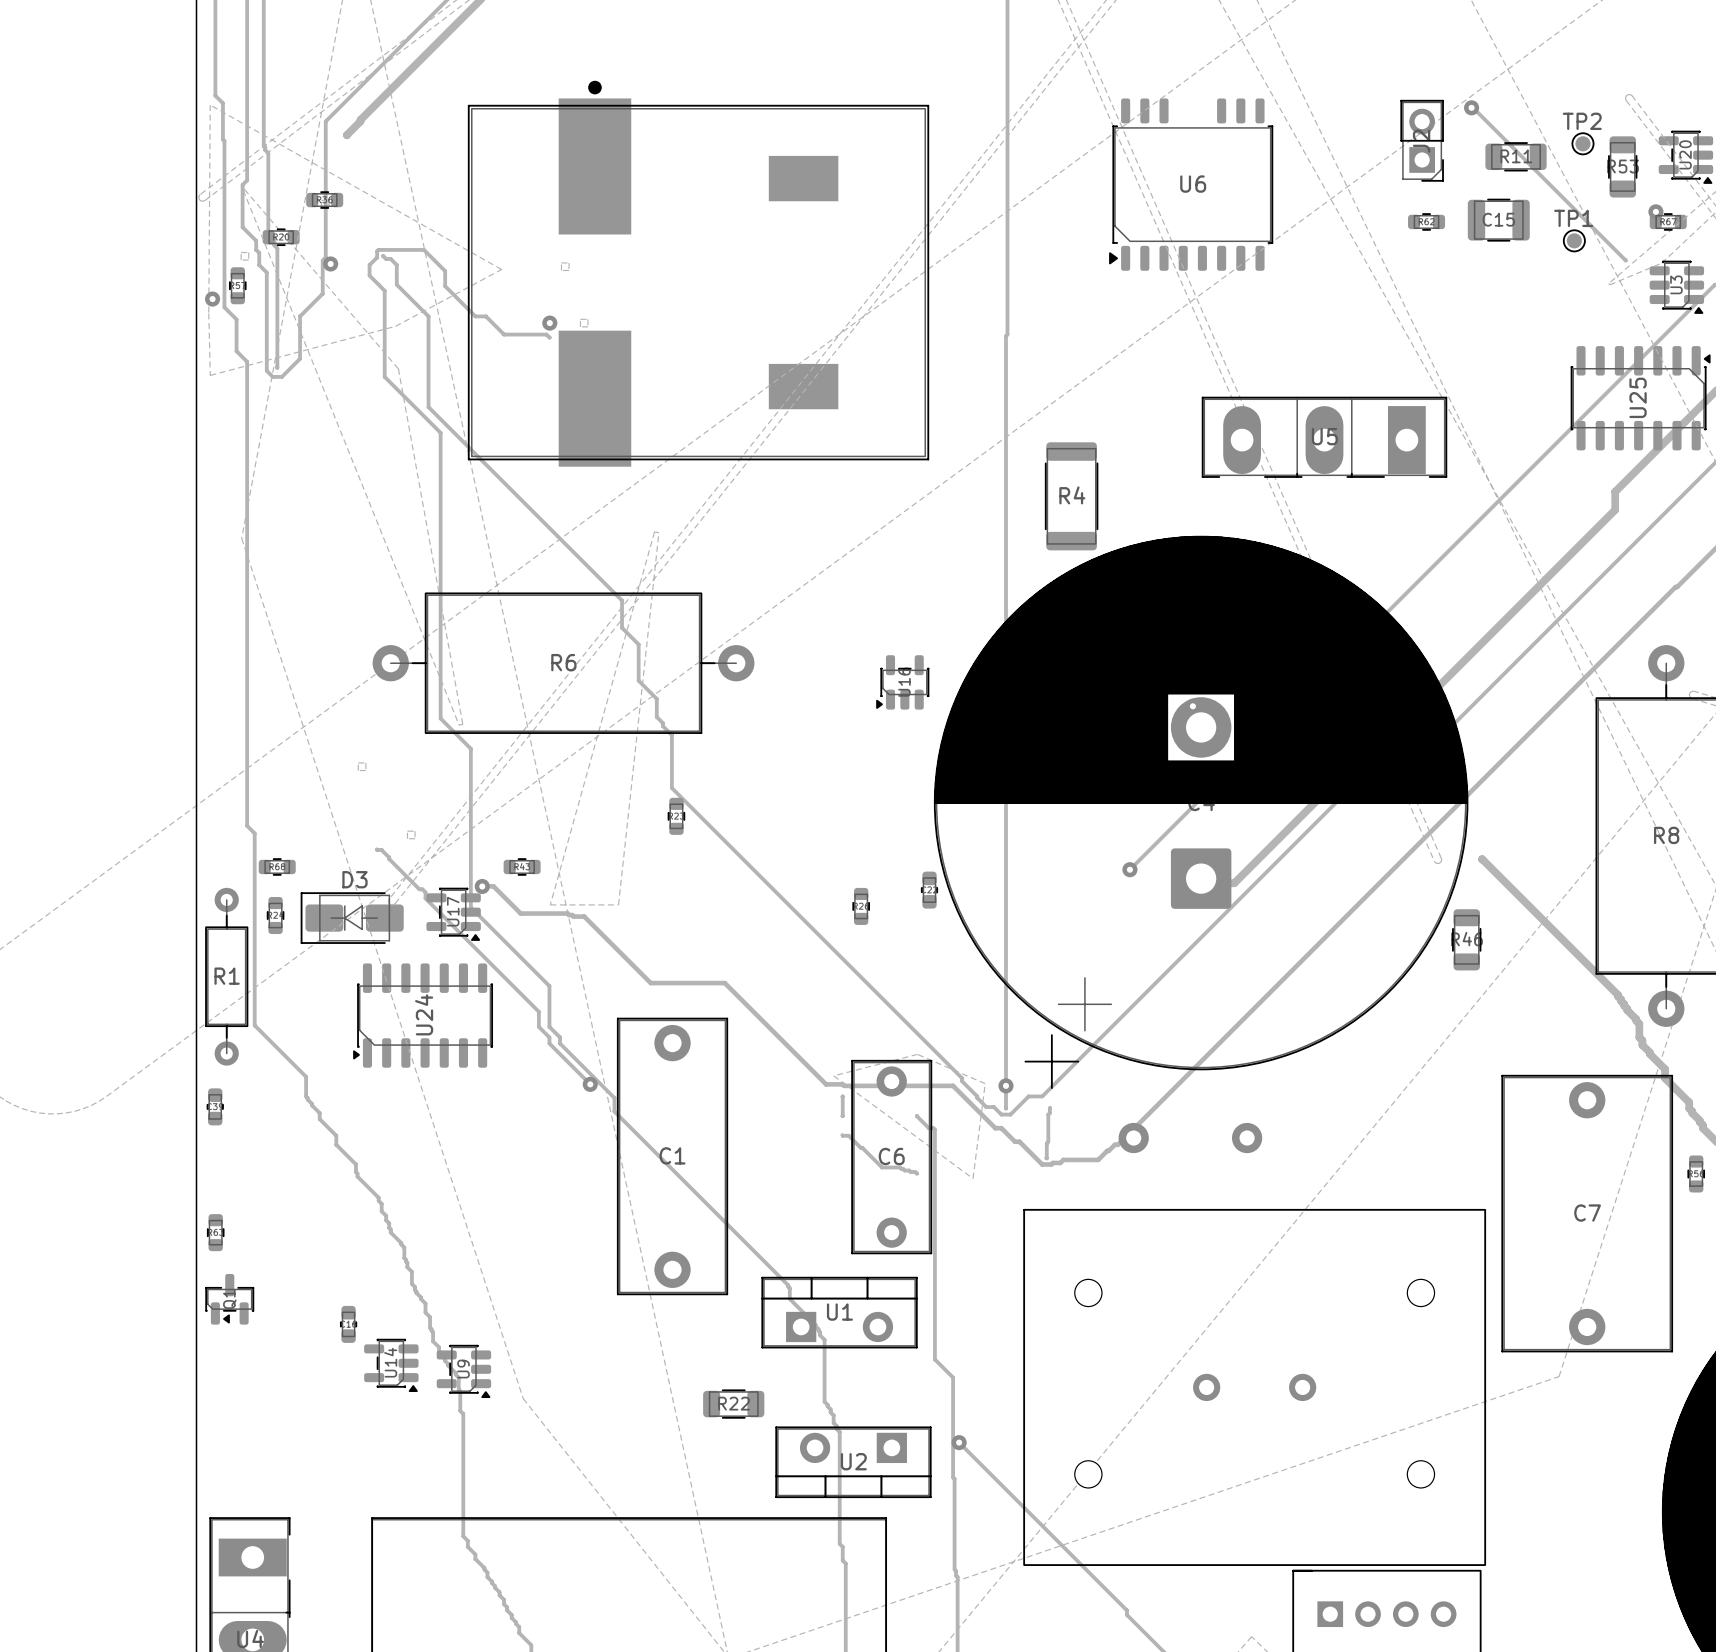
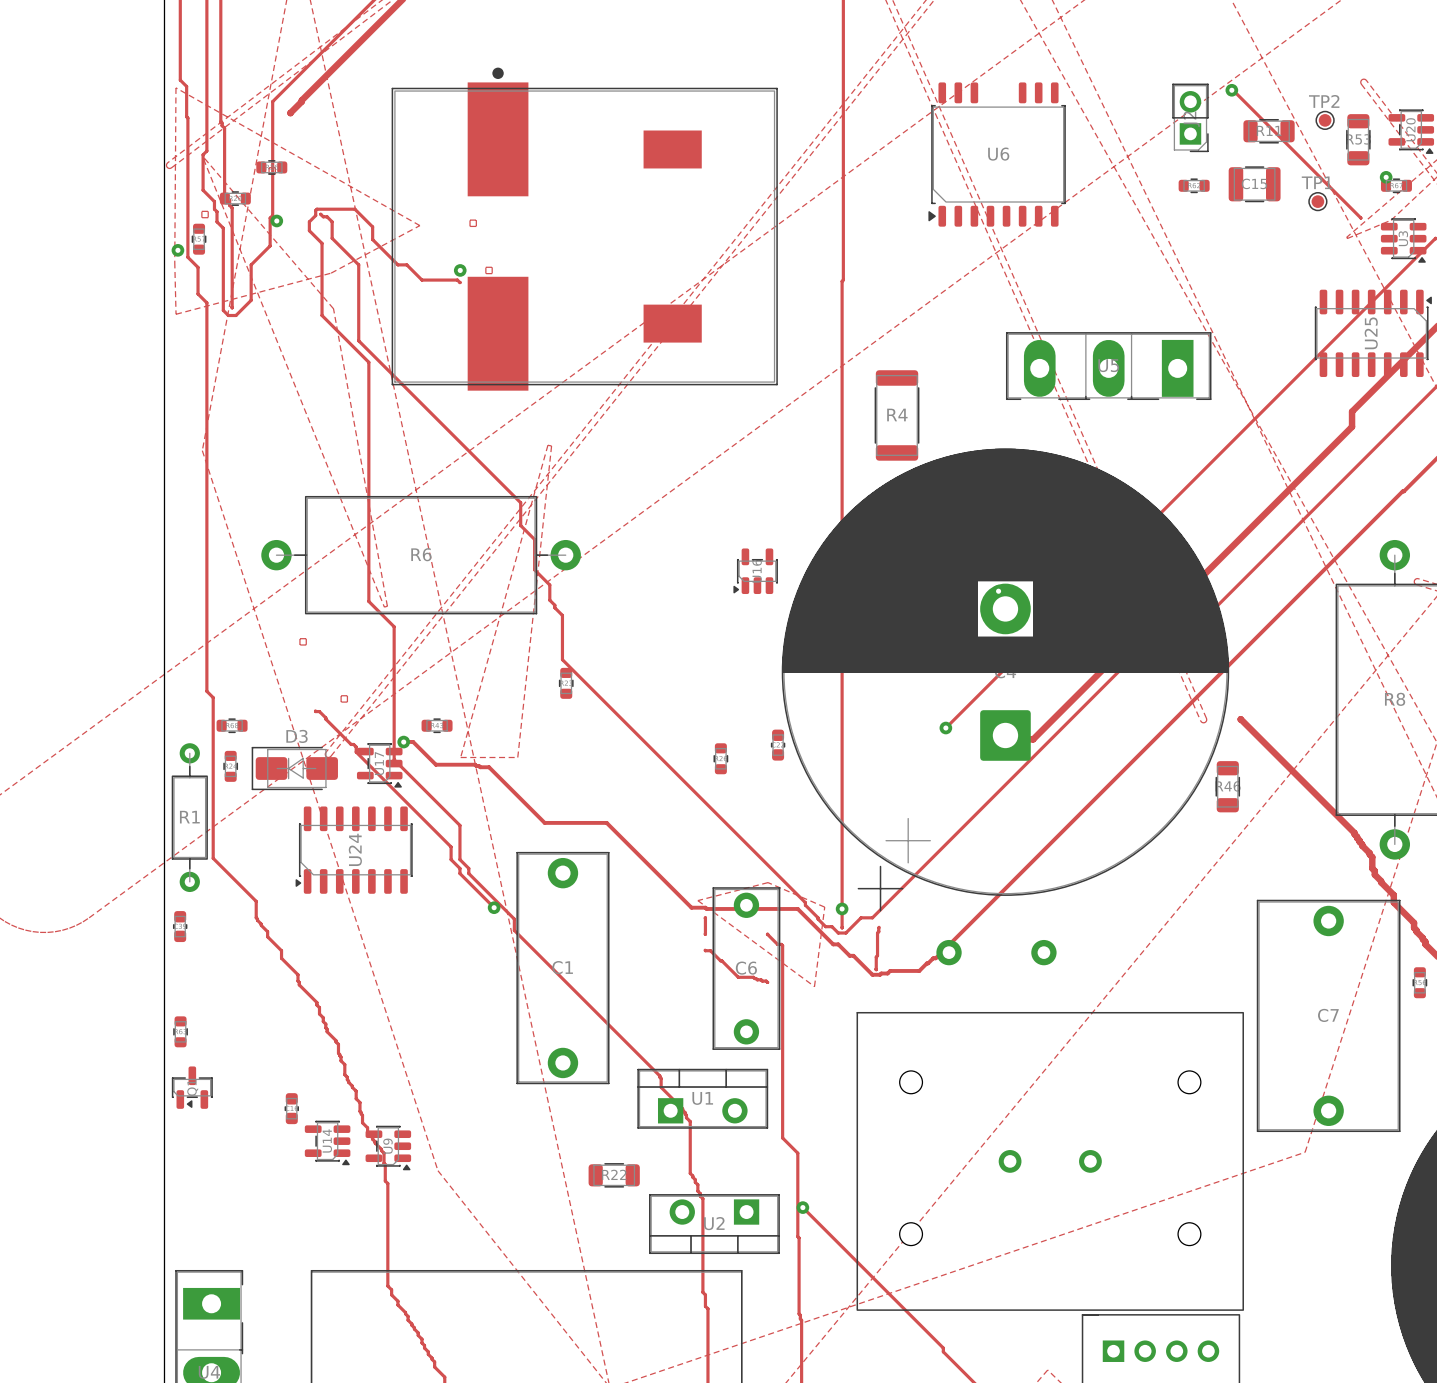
R6 position: (563, 663) -> (421, 555)

